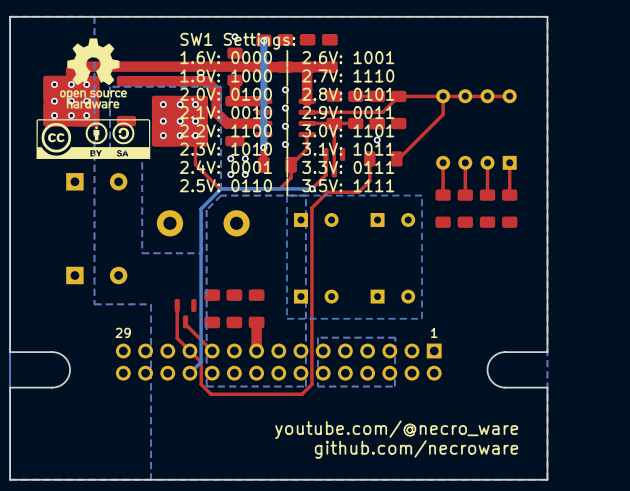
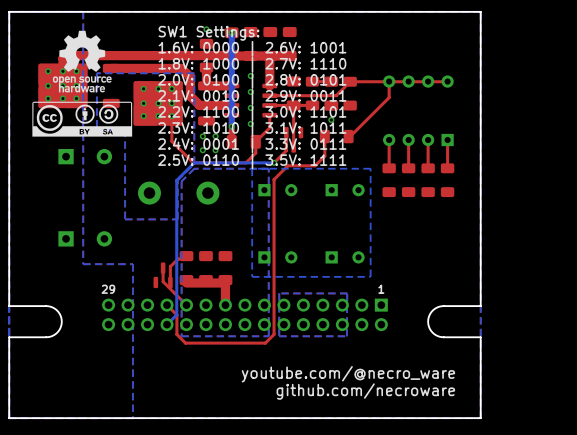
top track: none -> (186, 259) (178, 259) (170, 266) (170, 282)
top track: (177, 305) (177, 338) (189, 350) -> none
top track: none -> (163, 268) (163, 279)
part rotation: 0° (185, 313) -> 180° (163, 275)
top track: none -> (225, 283) (186, 283)

